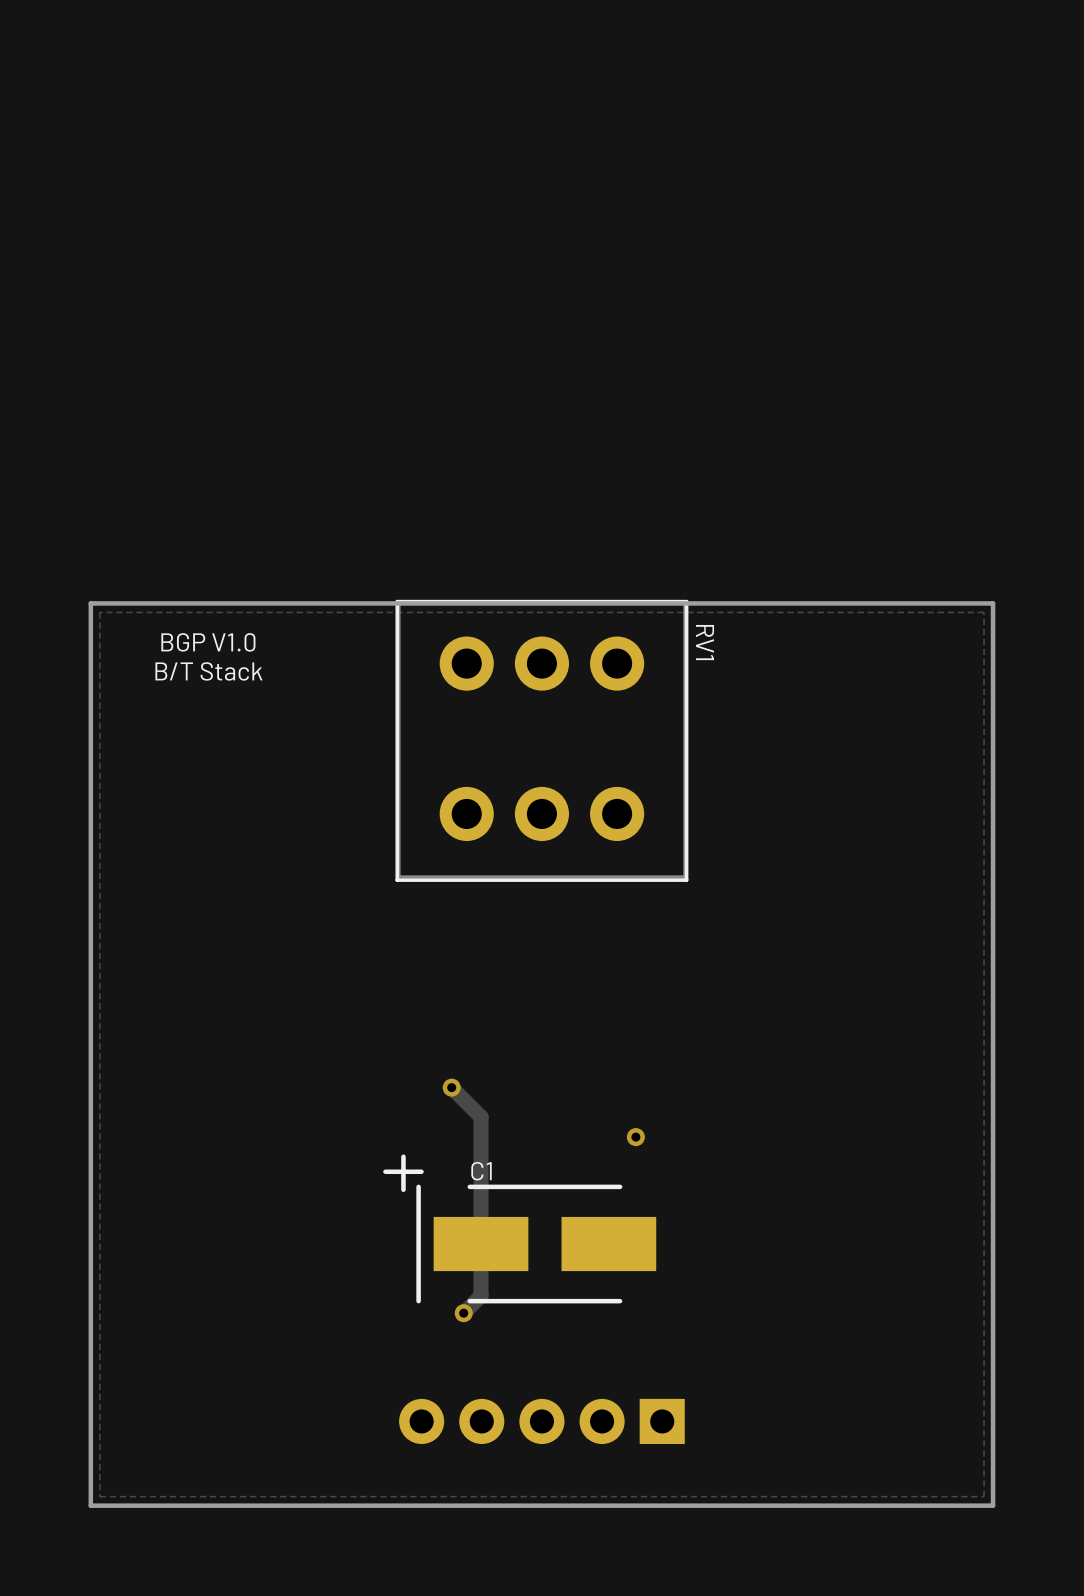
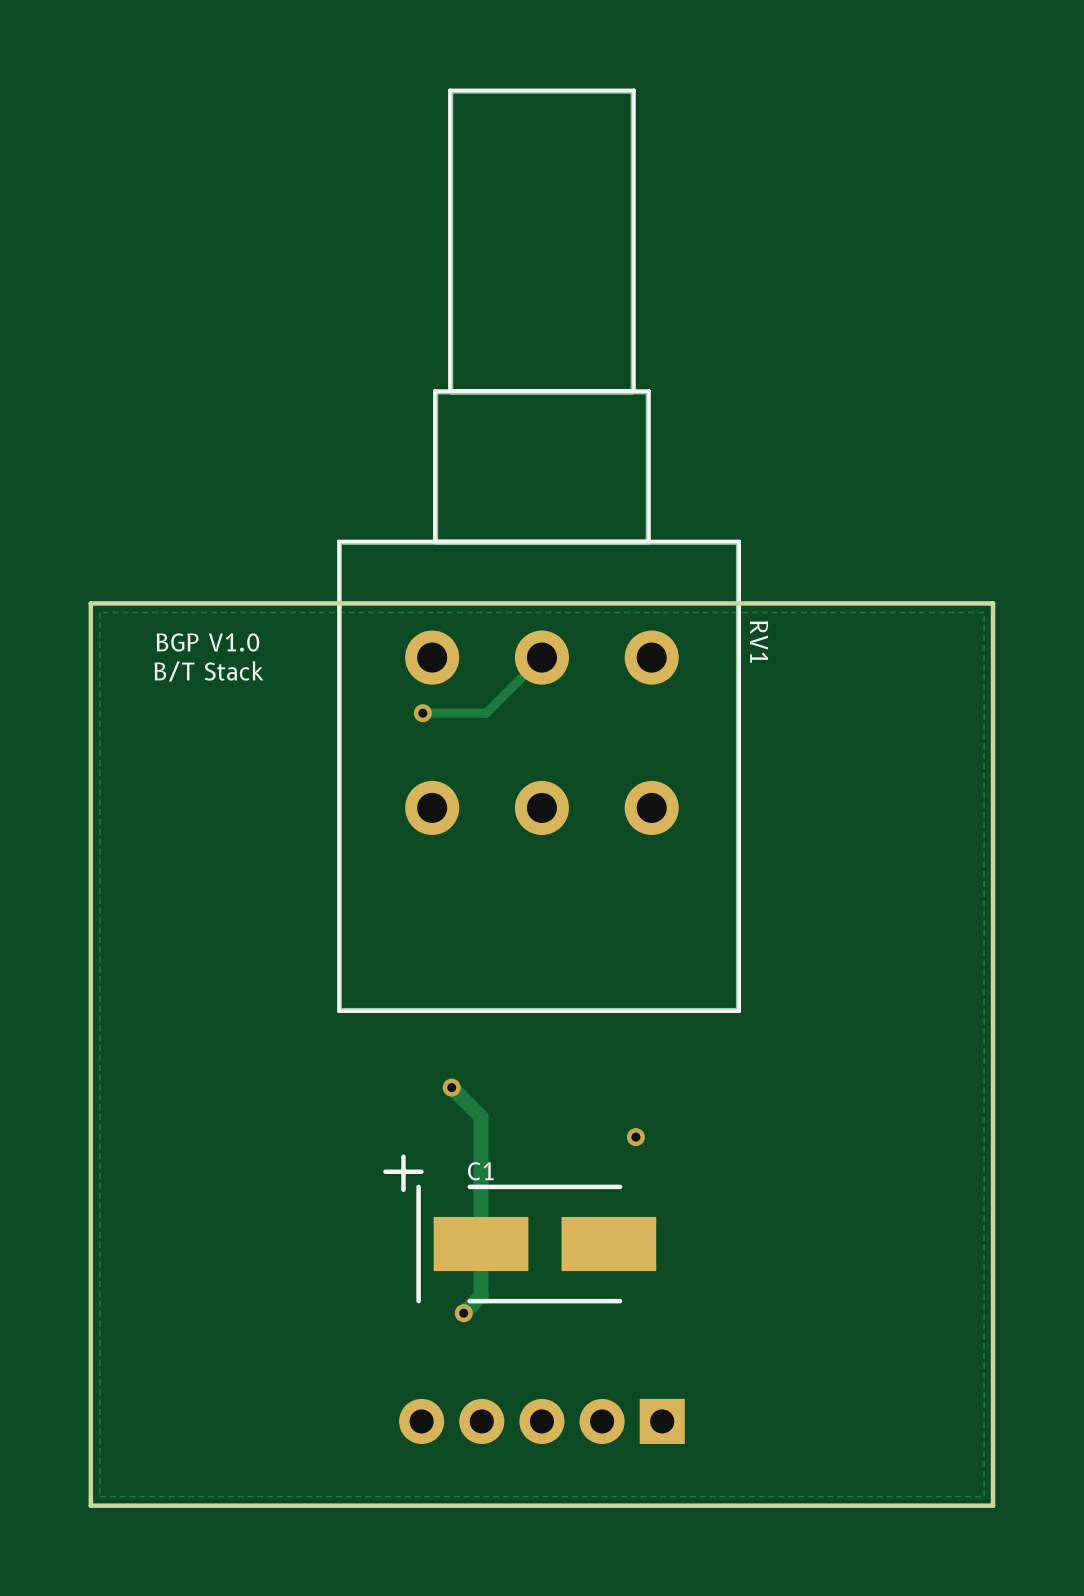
RV1 footprint: [395, 599, 689, 882] -> [337, 88, 742, 1014]
RV1 name position: RV1 (705, 642) -> RV1 (759, 641)
track: none -> (541, 657) (486, 713) (422, 713)
via: none -> (422, 713)

